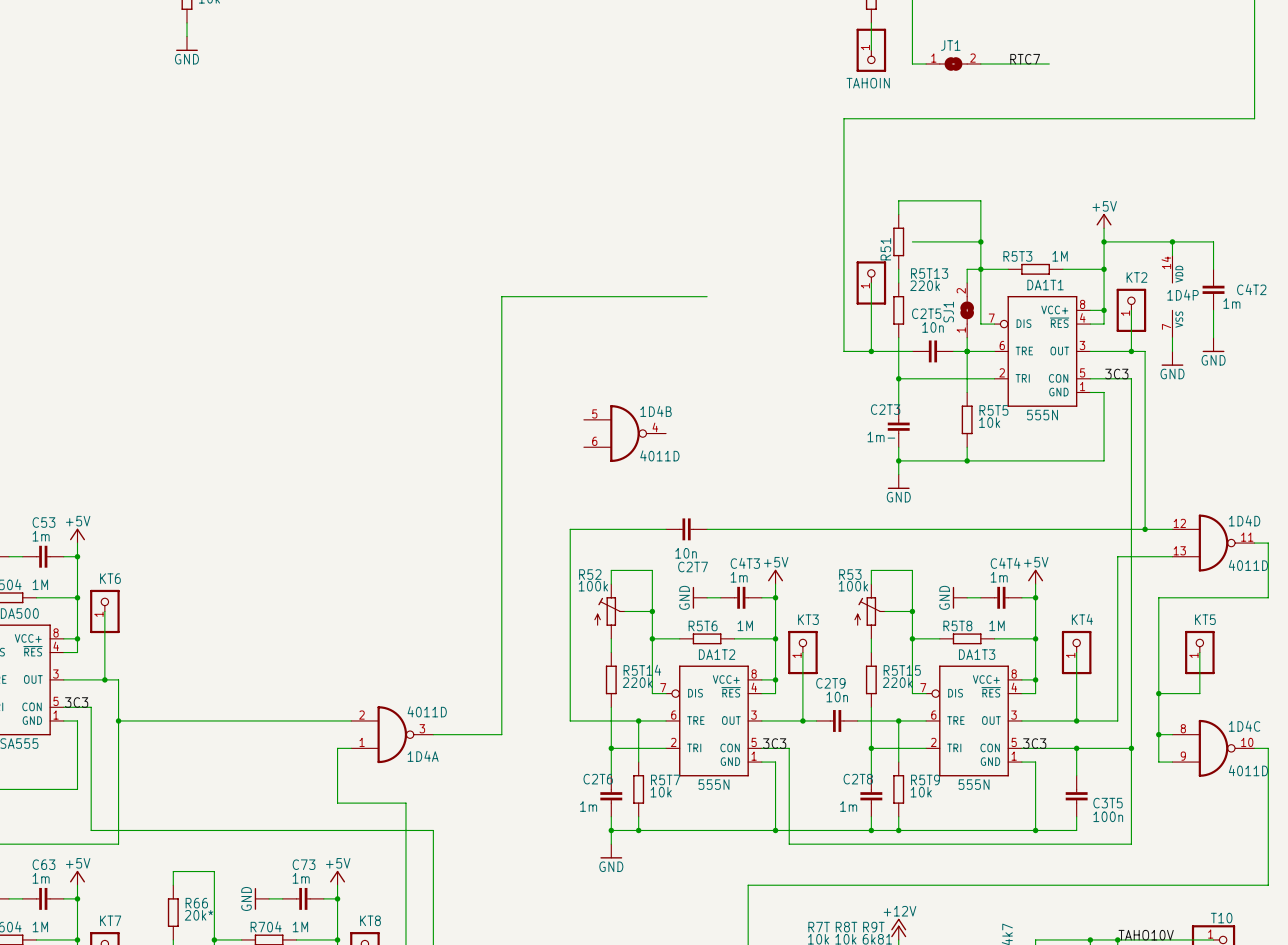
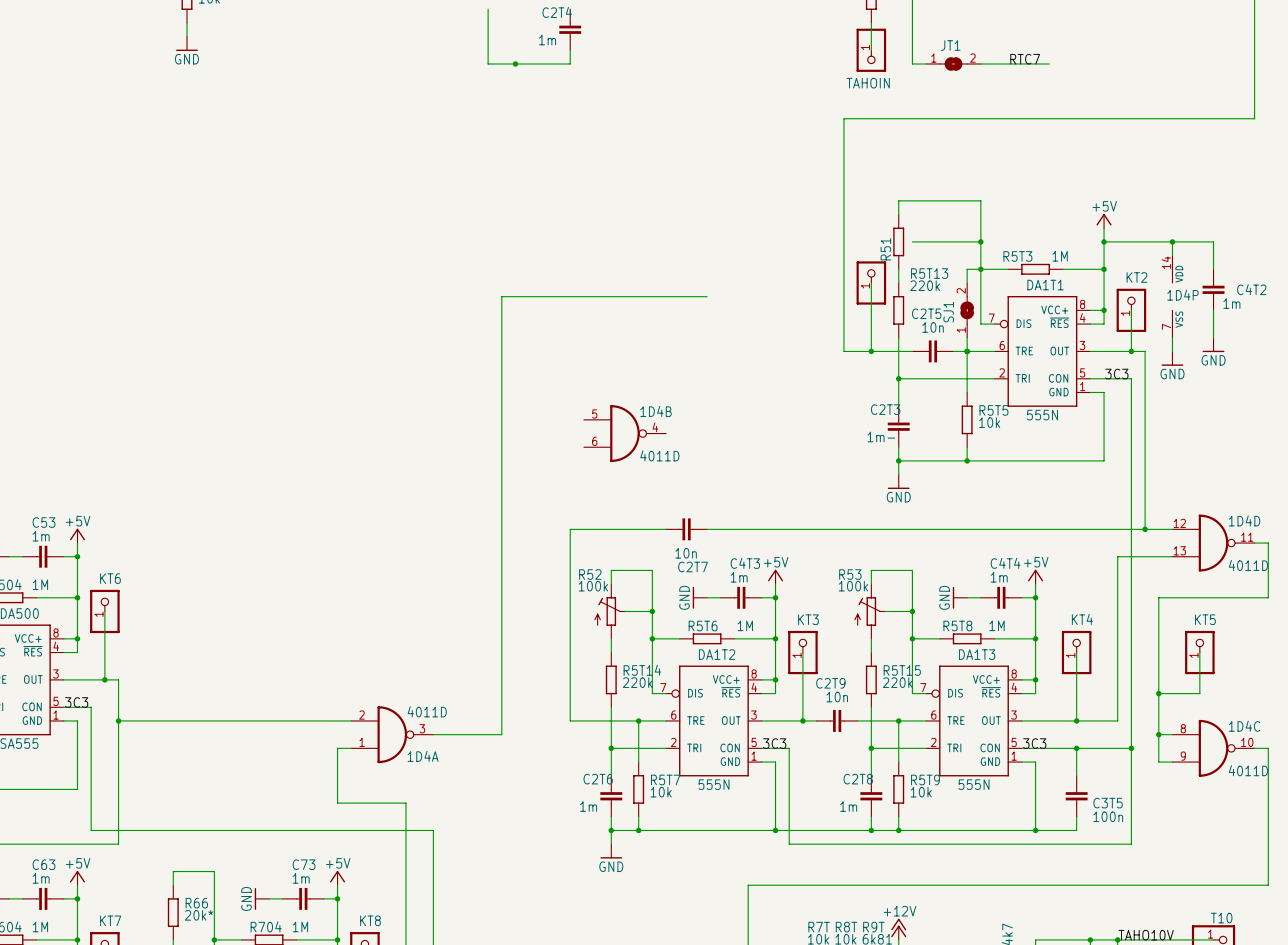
wire: none -> (488, 9) (488, 63) (570, 63) (570, 50)
C2T4: none -> 1m (570, 29)
junction: none -> (515, 63)

